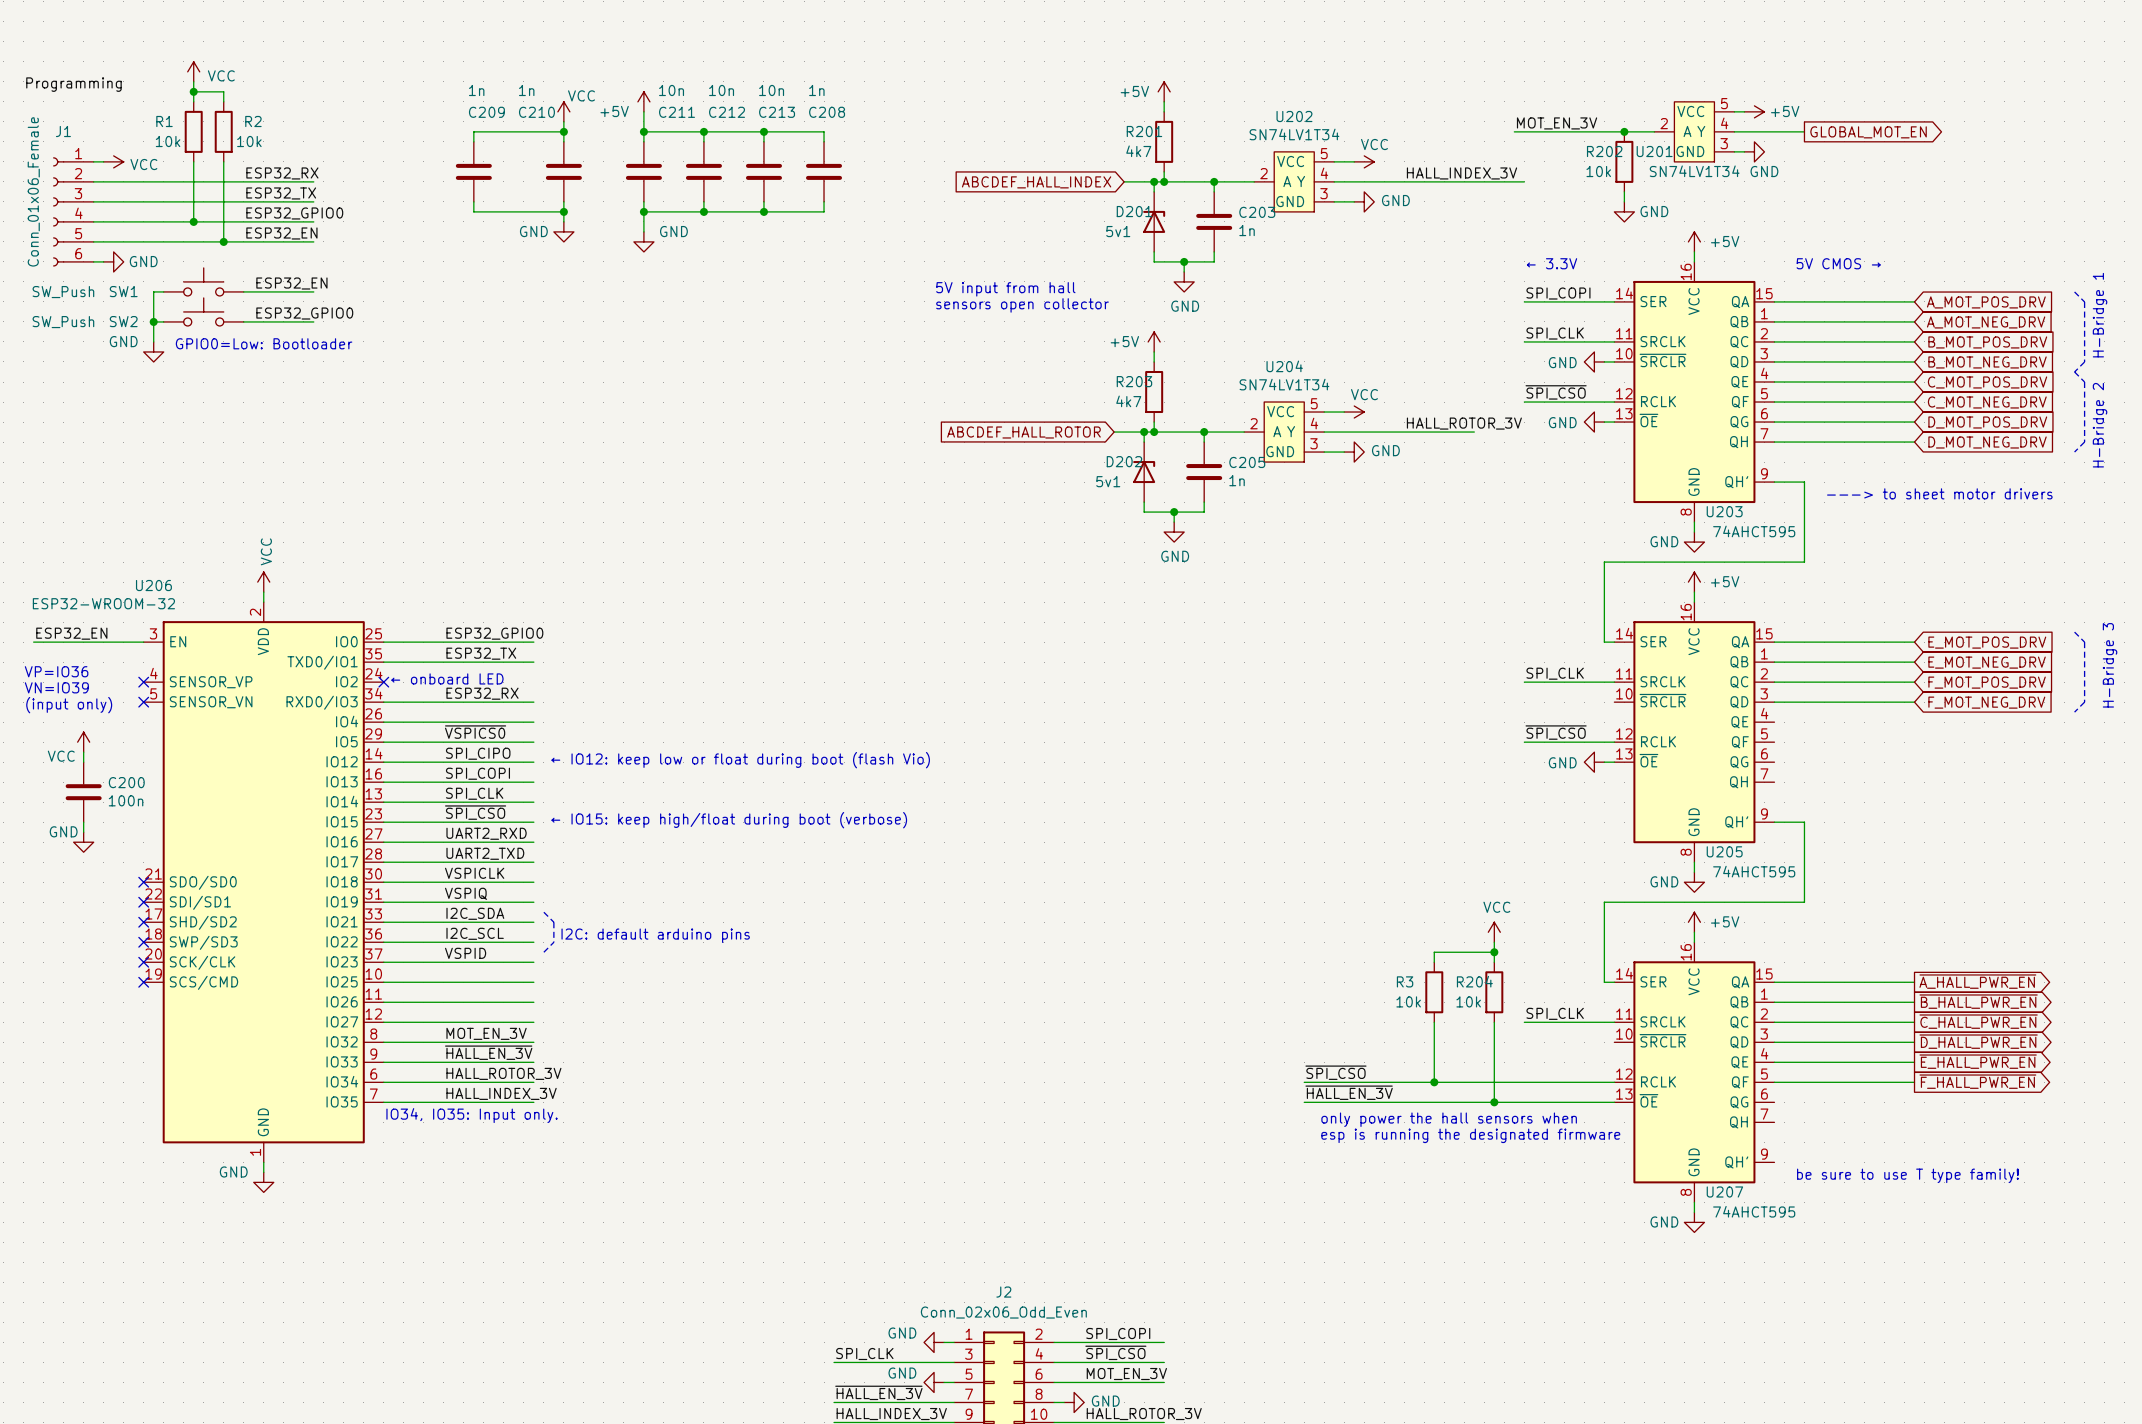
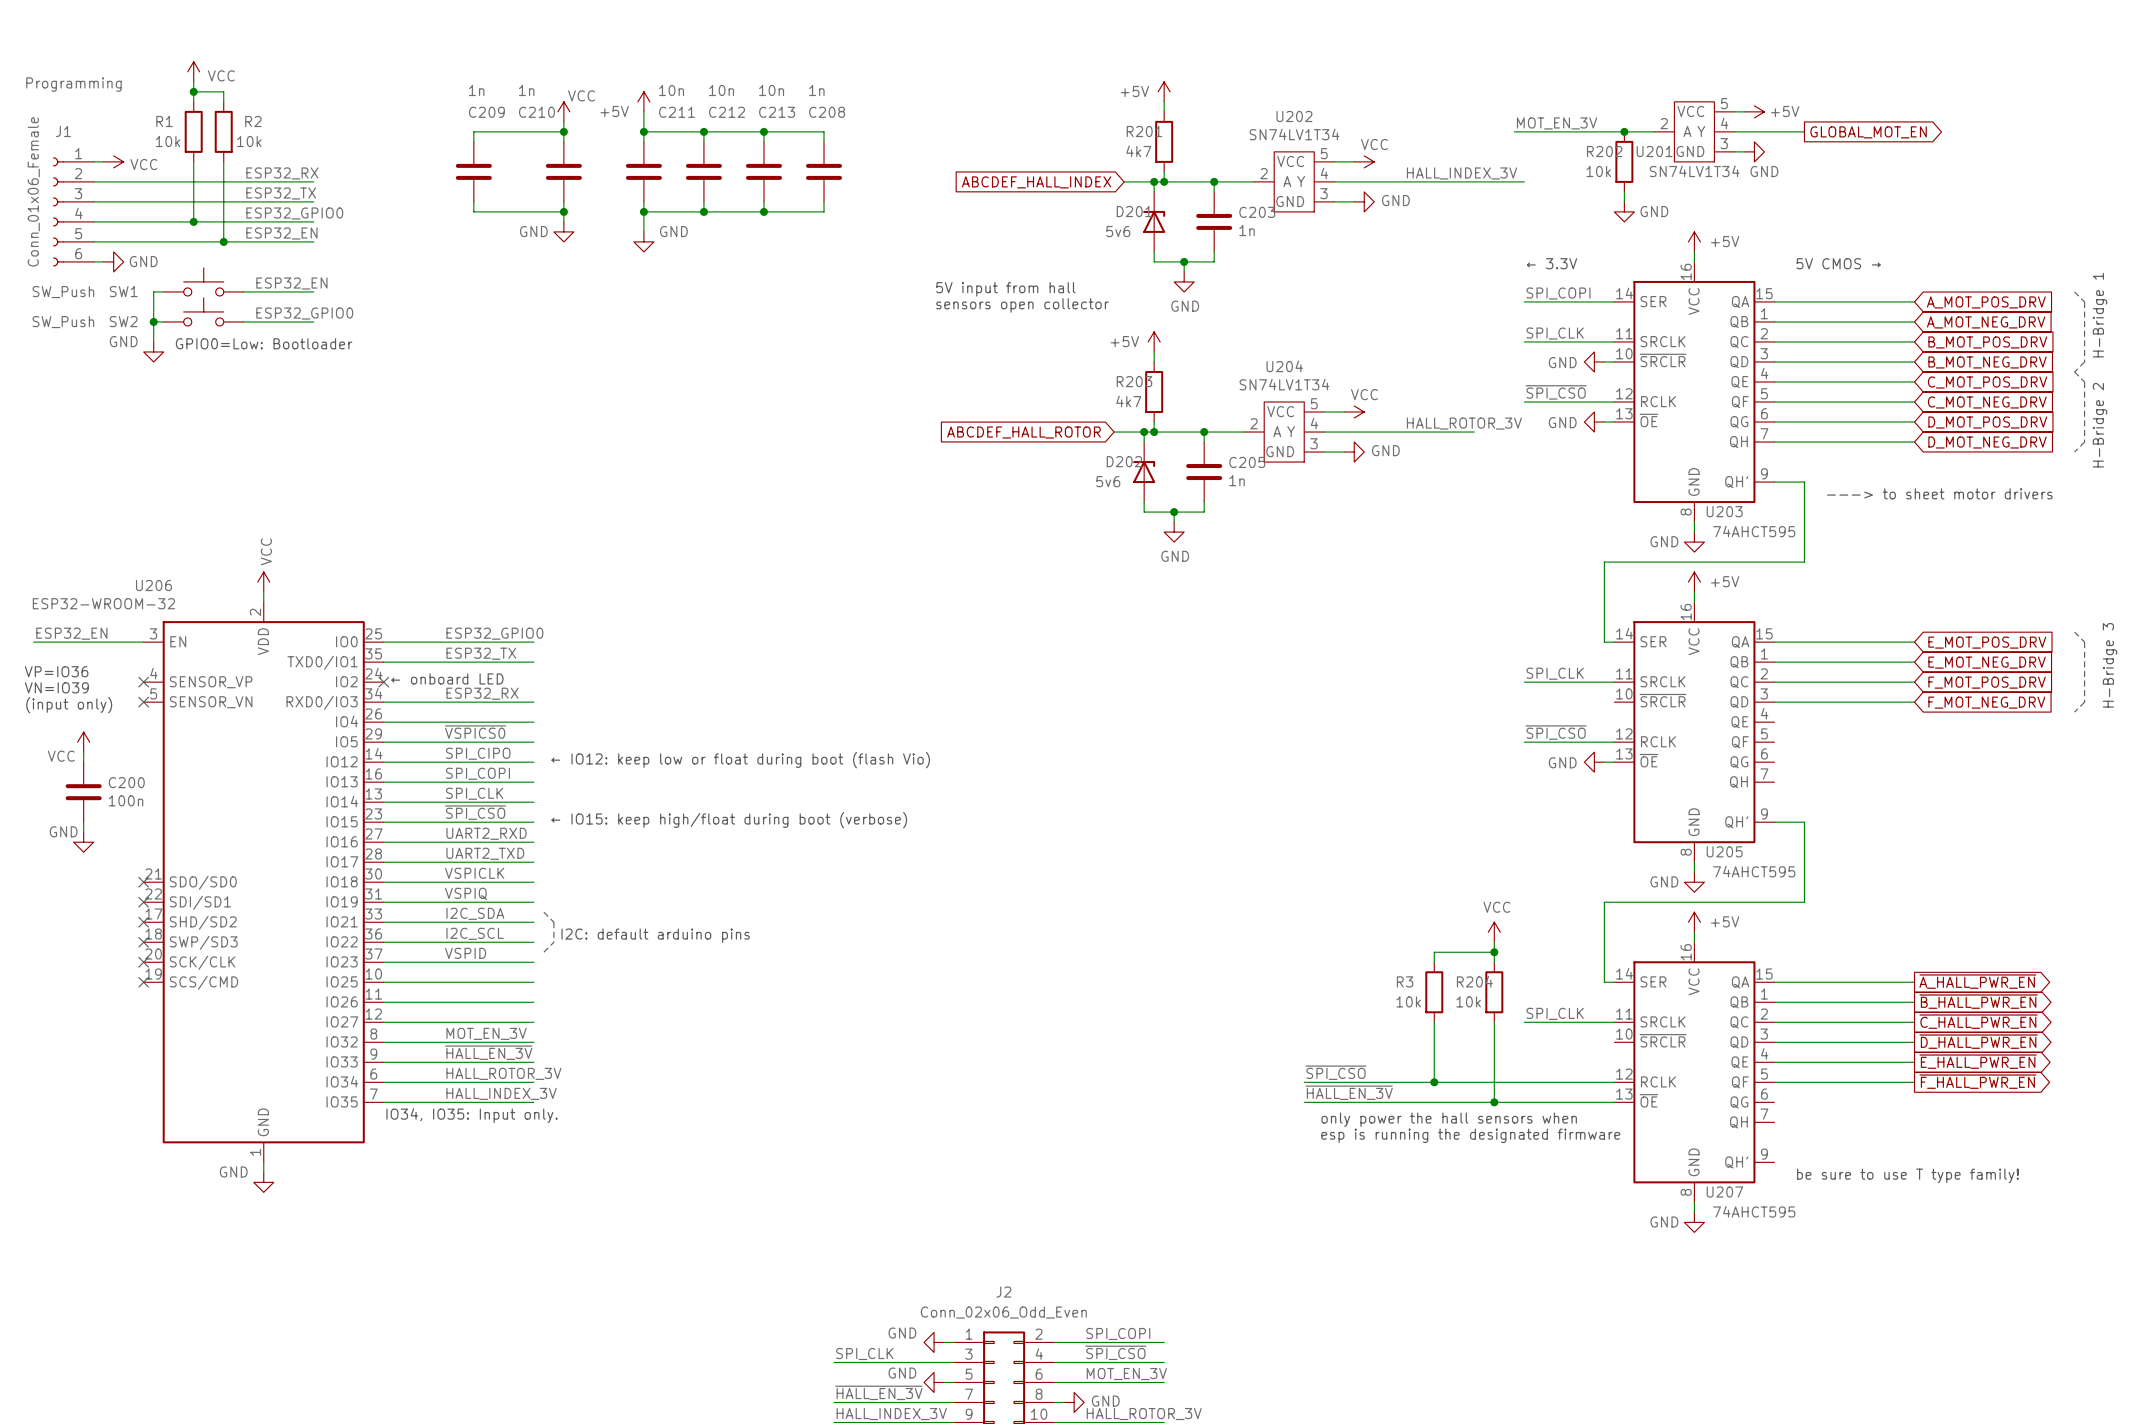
D201 value: 5v1 (1118, 231) -> 5v6 (1118, 231)
D202 value: 5v1 (1108, 481) -> 5v6 (1108, 481)

